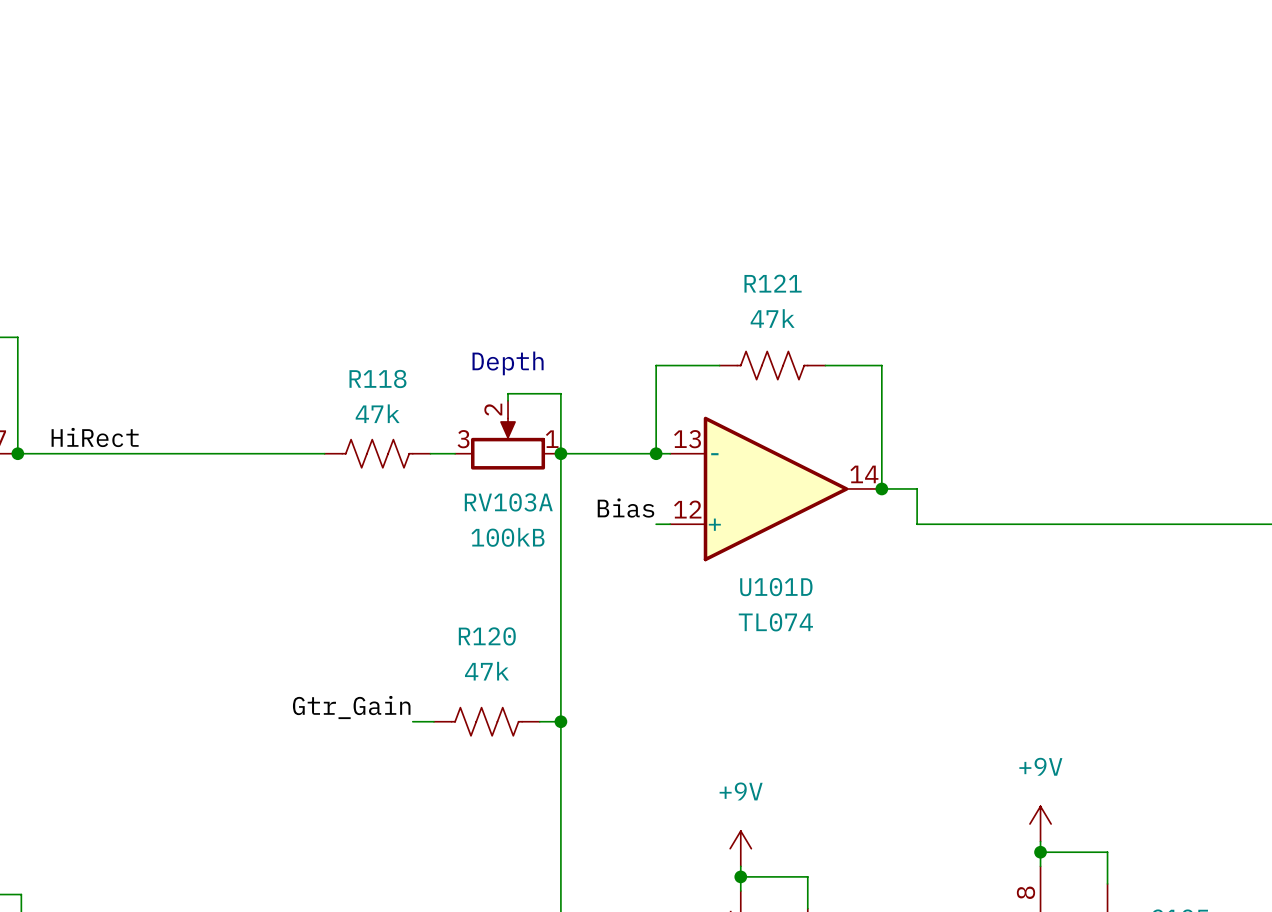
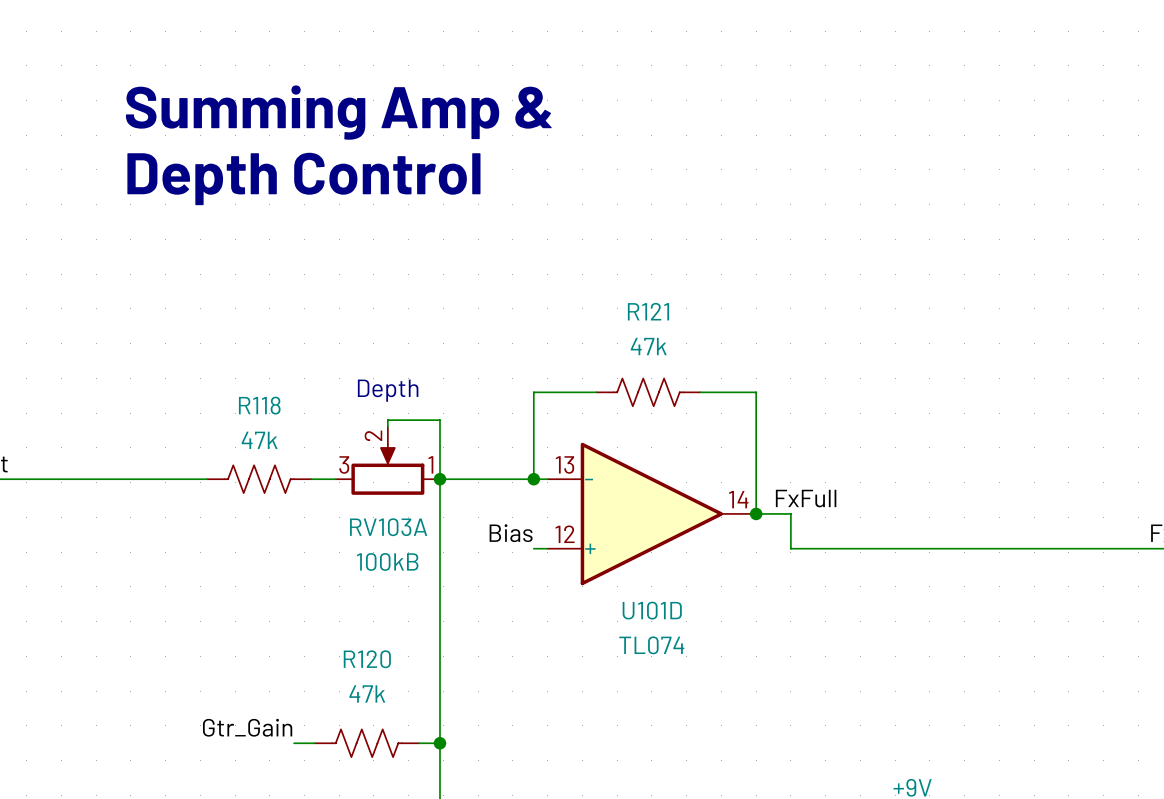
text: none -> Summing Amp & (338, 112)
text: none -> Depth Control (303, 178)
label: none -> FxFull (806, 498)

